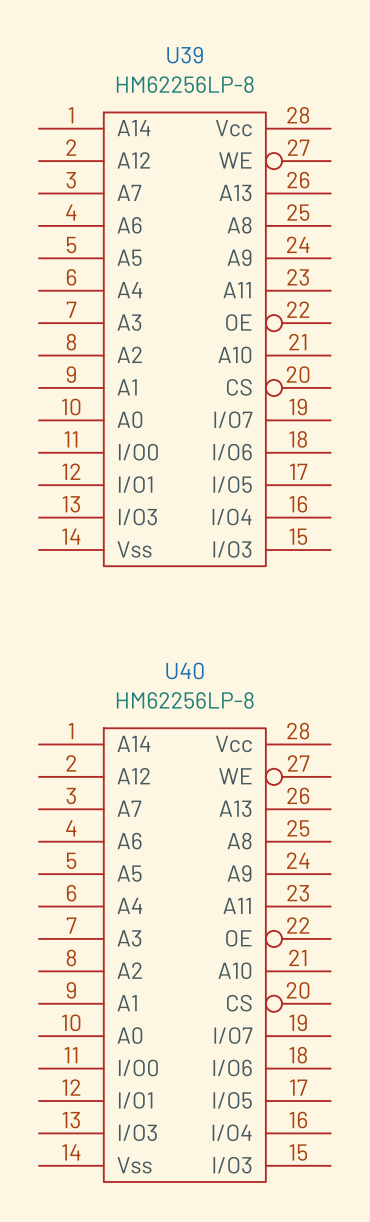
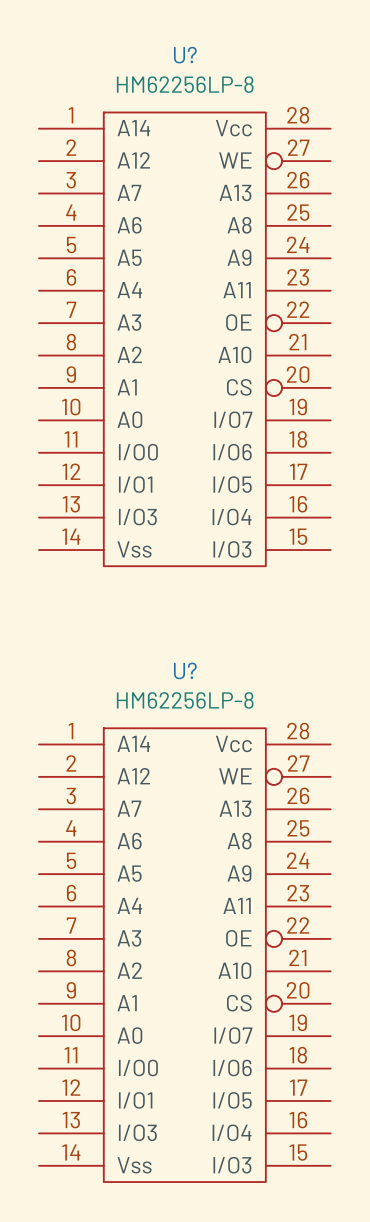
U39 name: U39 (185, 55) -> U? (185, 55)
U40 name: U40 (185, 670) -> U? (185, 670)

